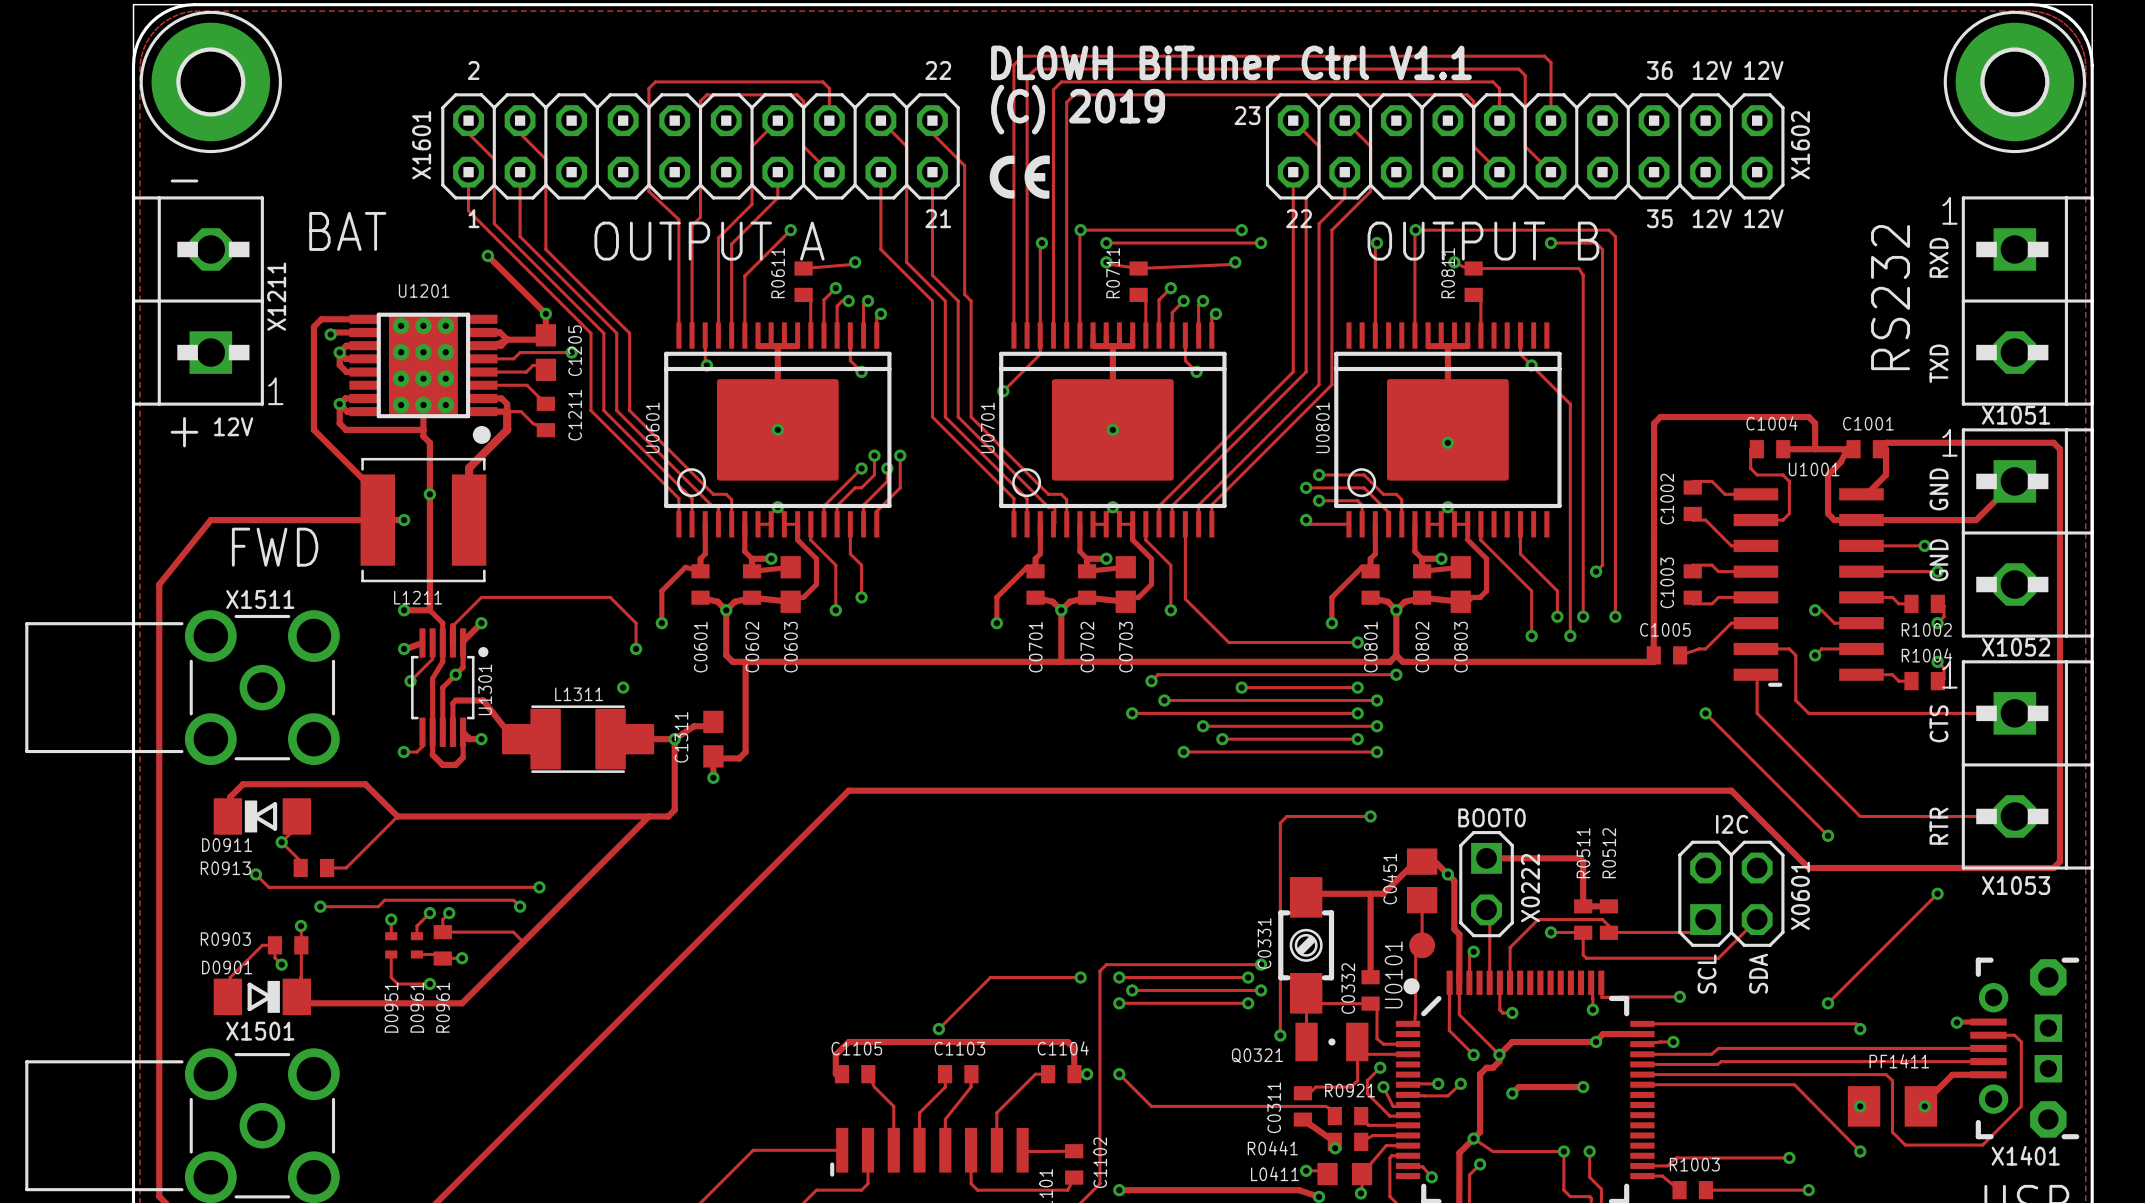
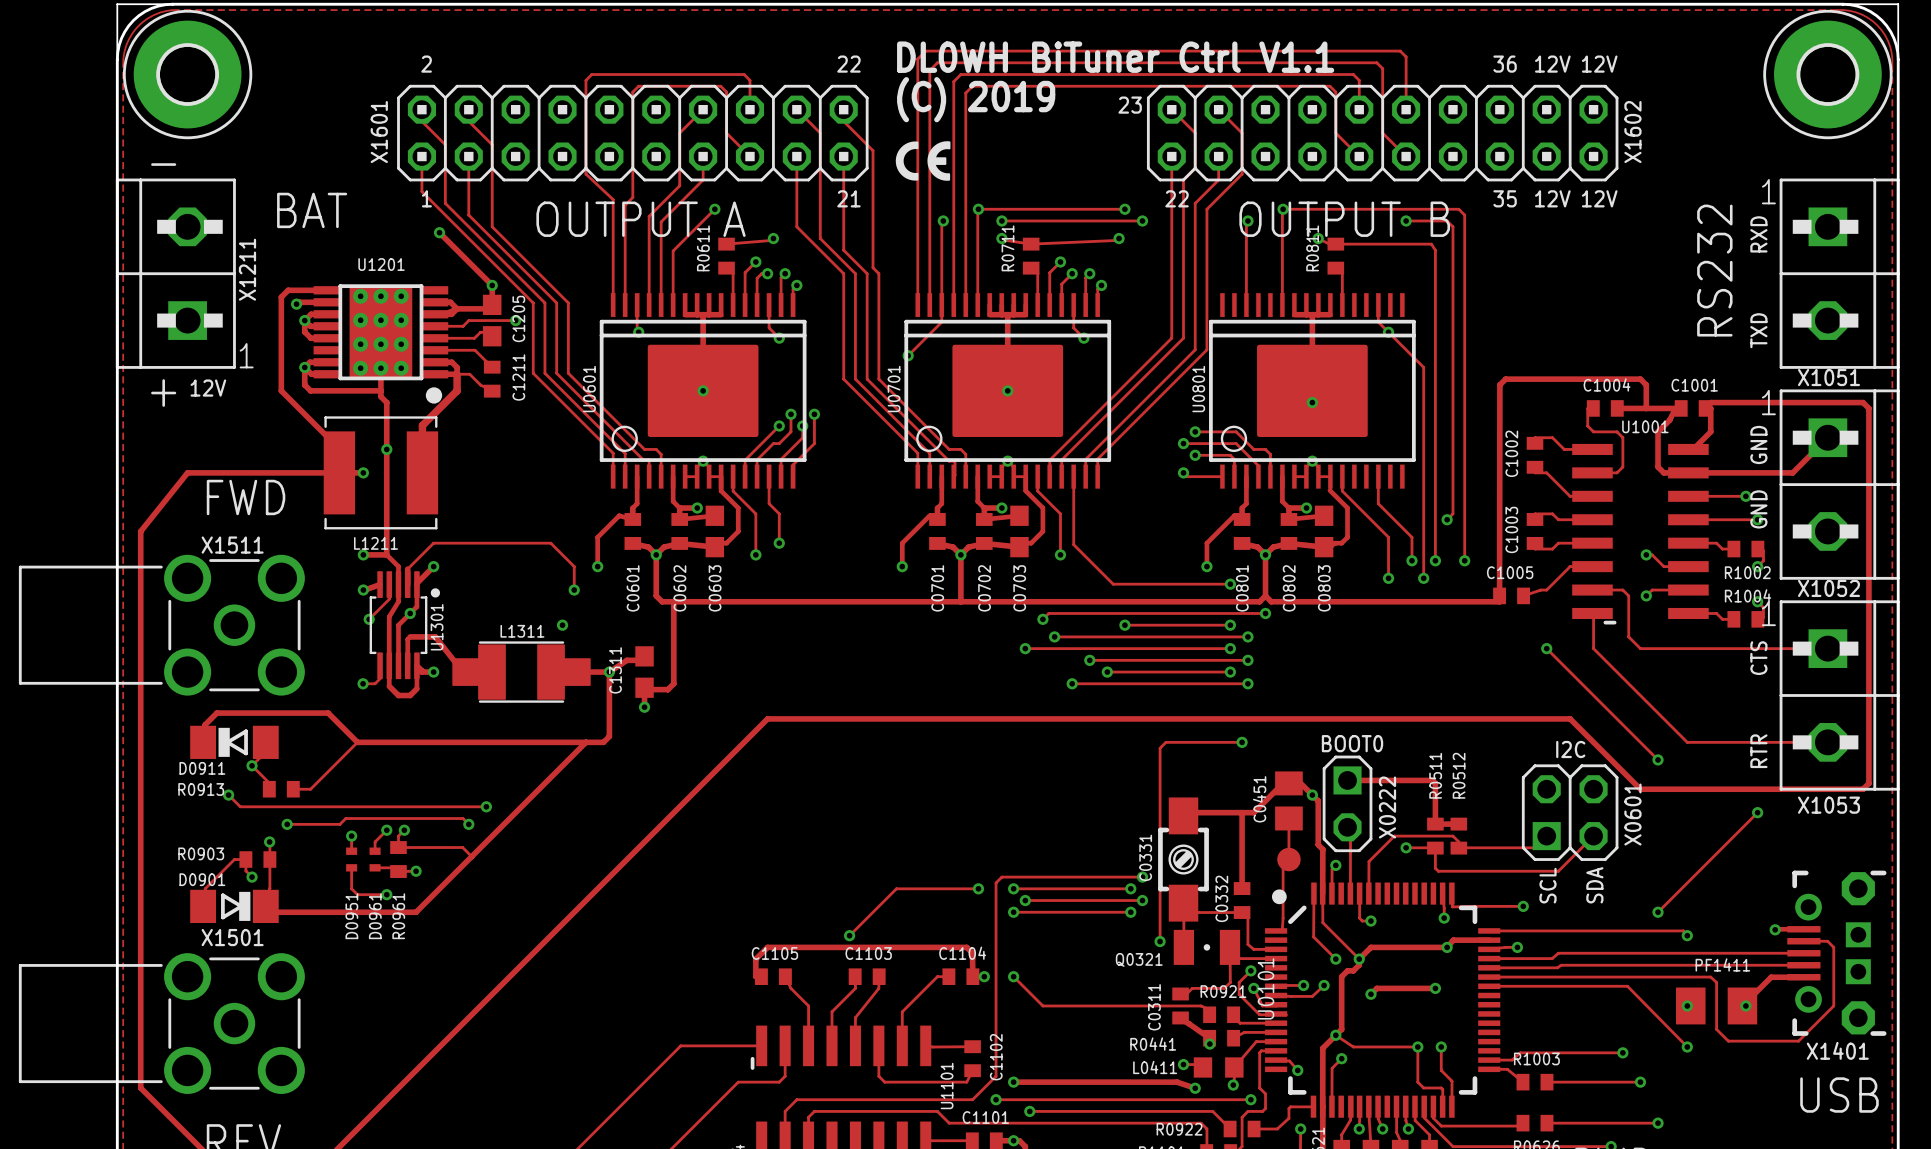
U0101 name position: U0101 (1393, 974) -> U0101 (1266, 988)

